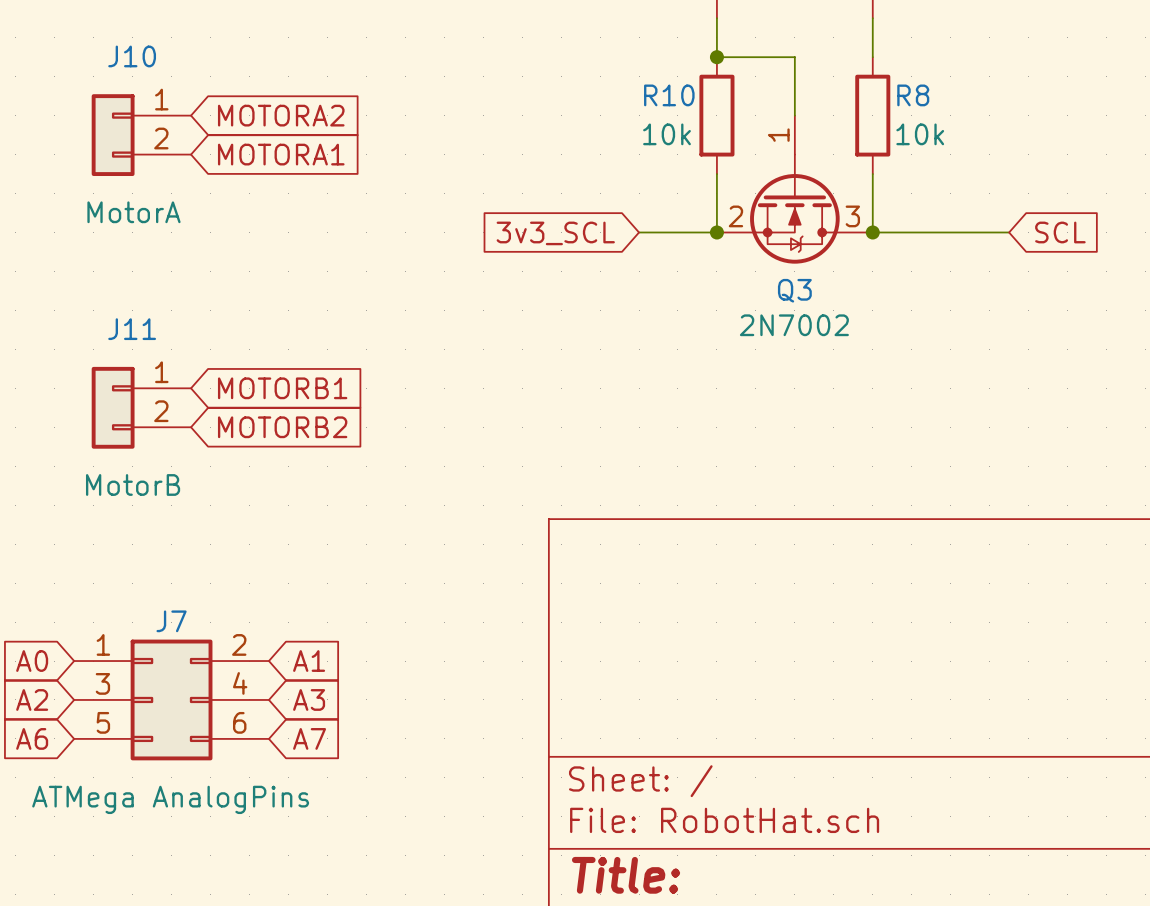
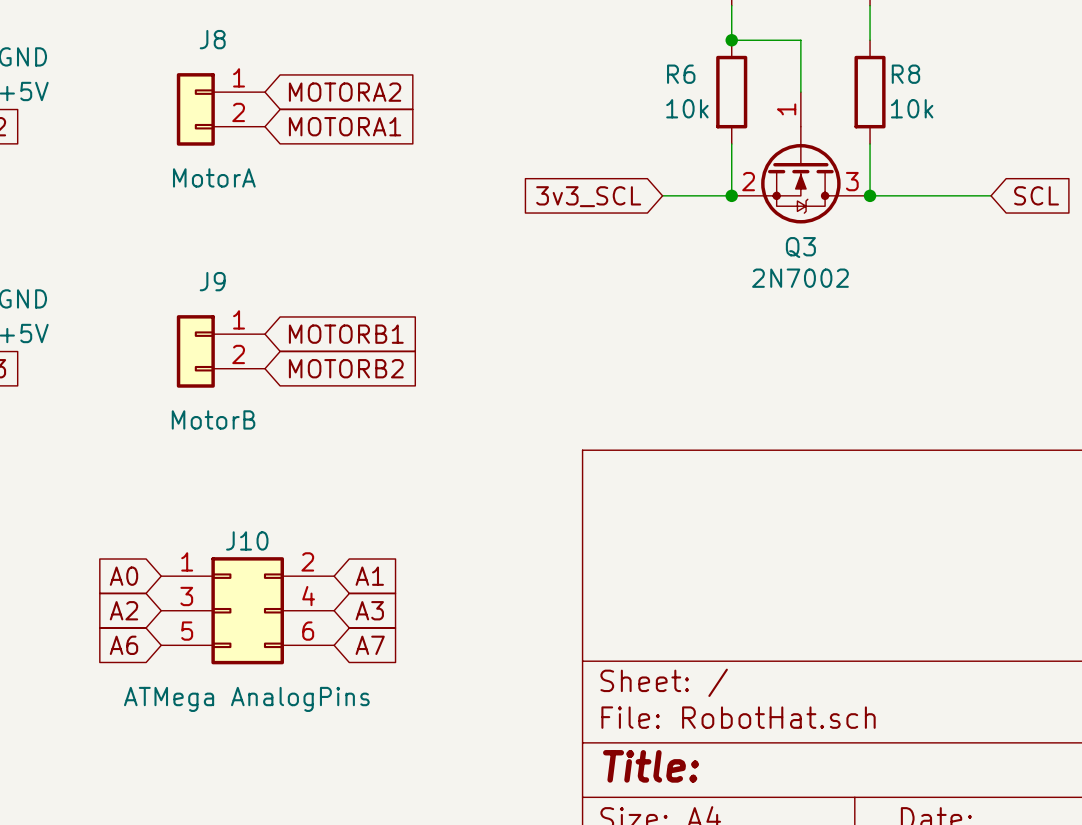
J10 name: J10 (132, 56) -> J8 (212, 39)
R10 name: R10 (669, 95) -> R6 (681, 74)
J11 name: J11 (132, 329) -> J9 (212, 281)
J7 name: J7 (171, 621) -> J10 (247, 540)

